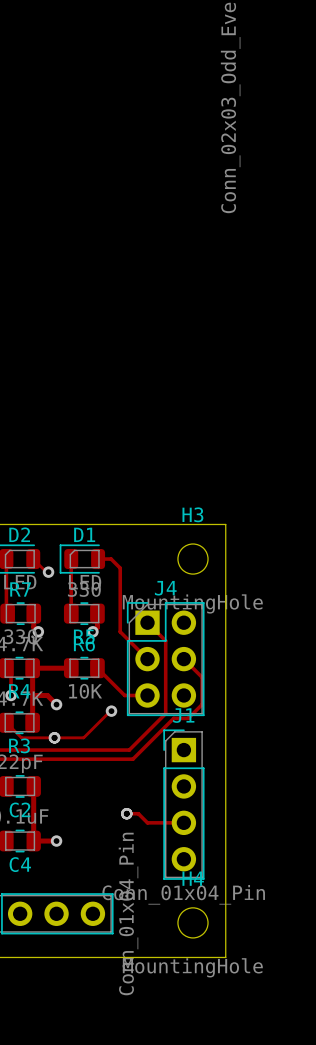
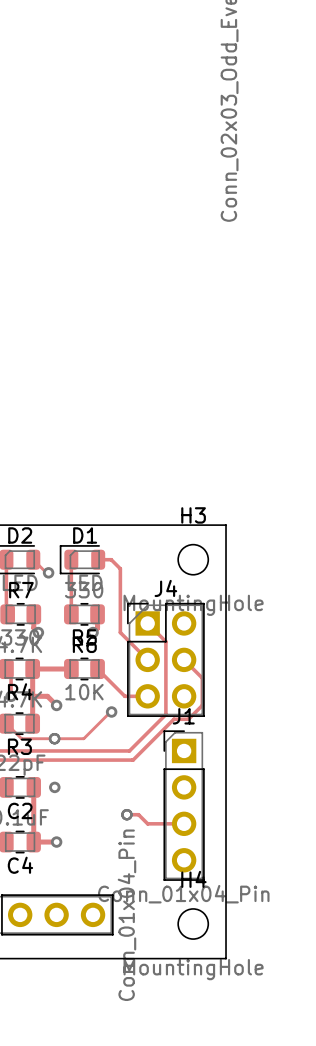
via: none -> (54, 787)

